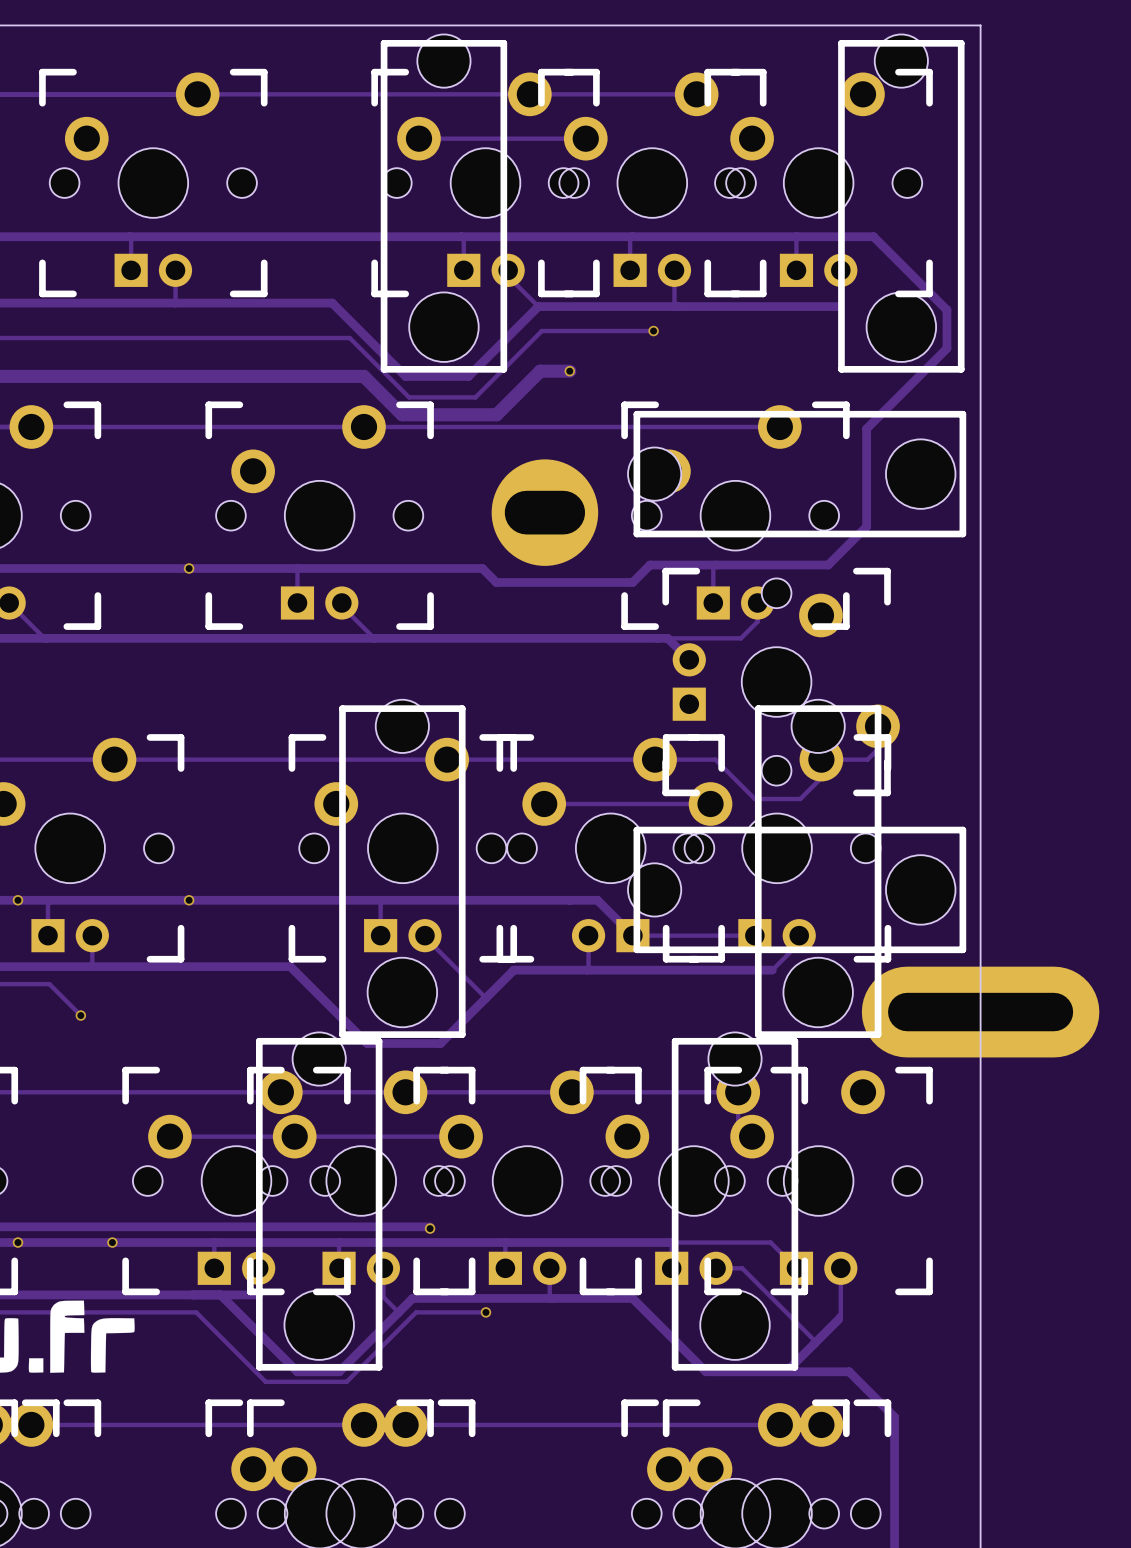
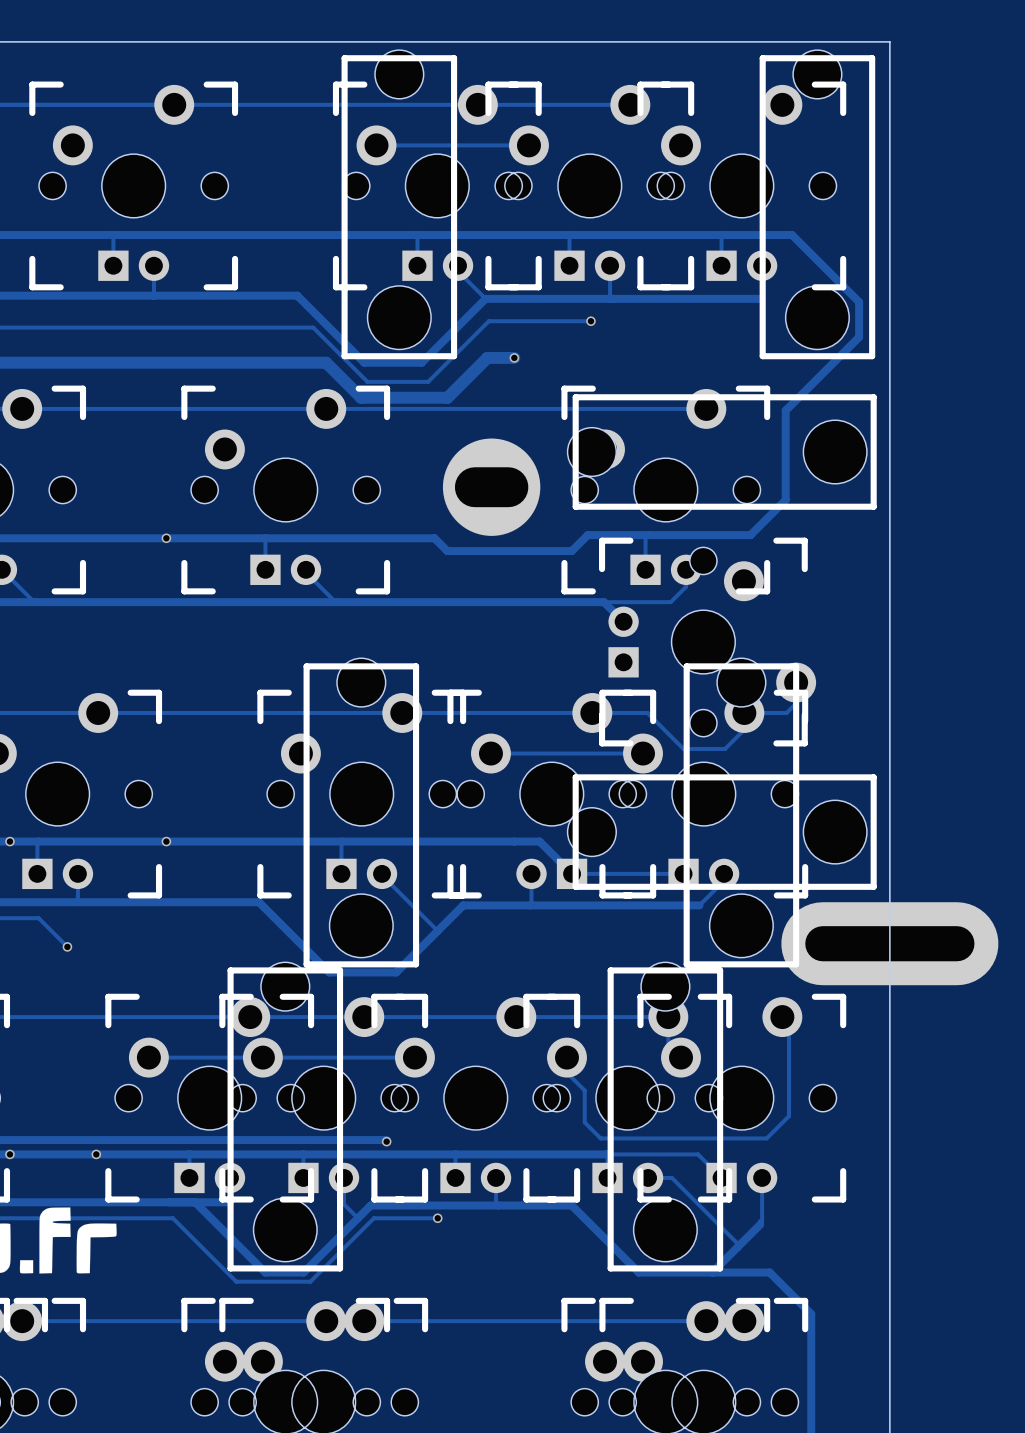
track: none -> (782, 1017) (789, 1023) (789, 1116) (766, 1138) (600, 1138) (584, 1122) (584, 1090) (566, 1072) (566, 1057)

